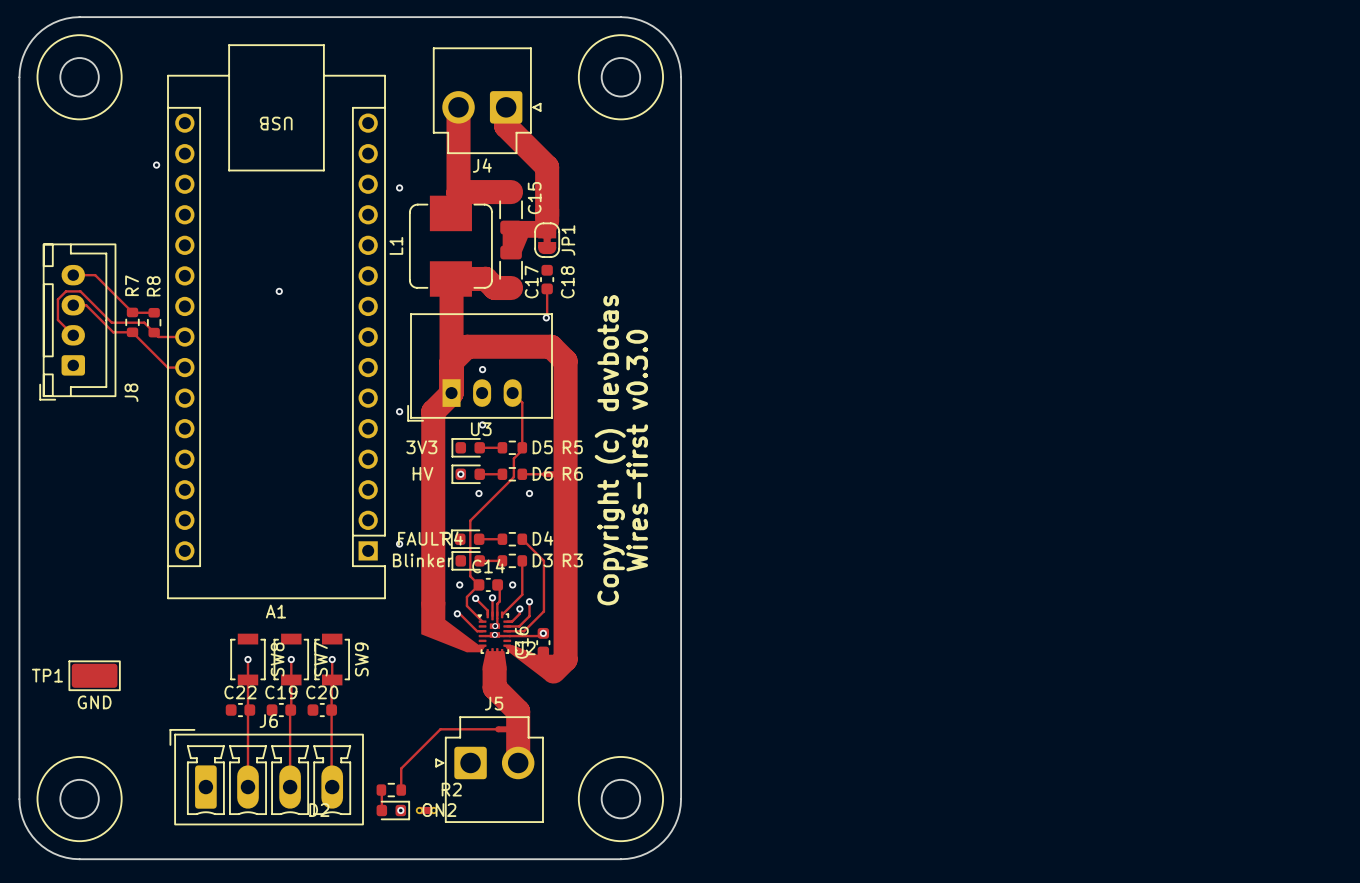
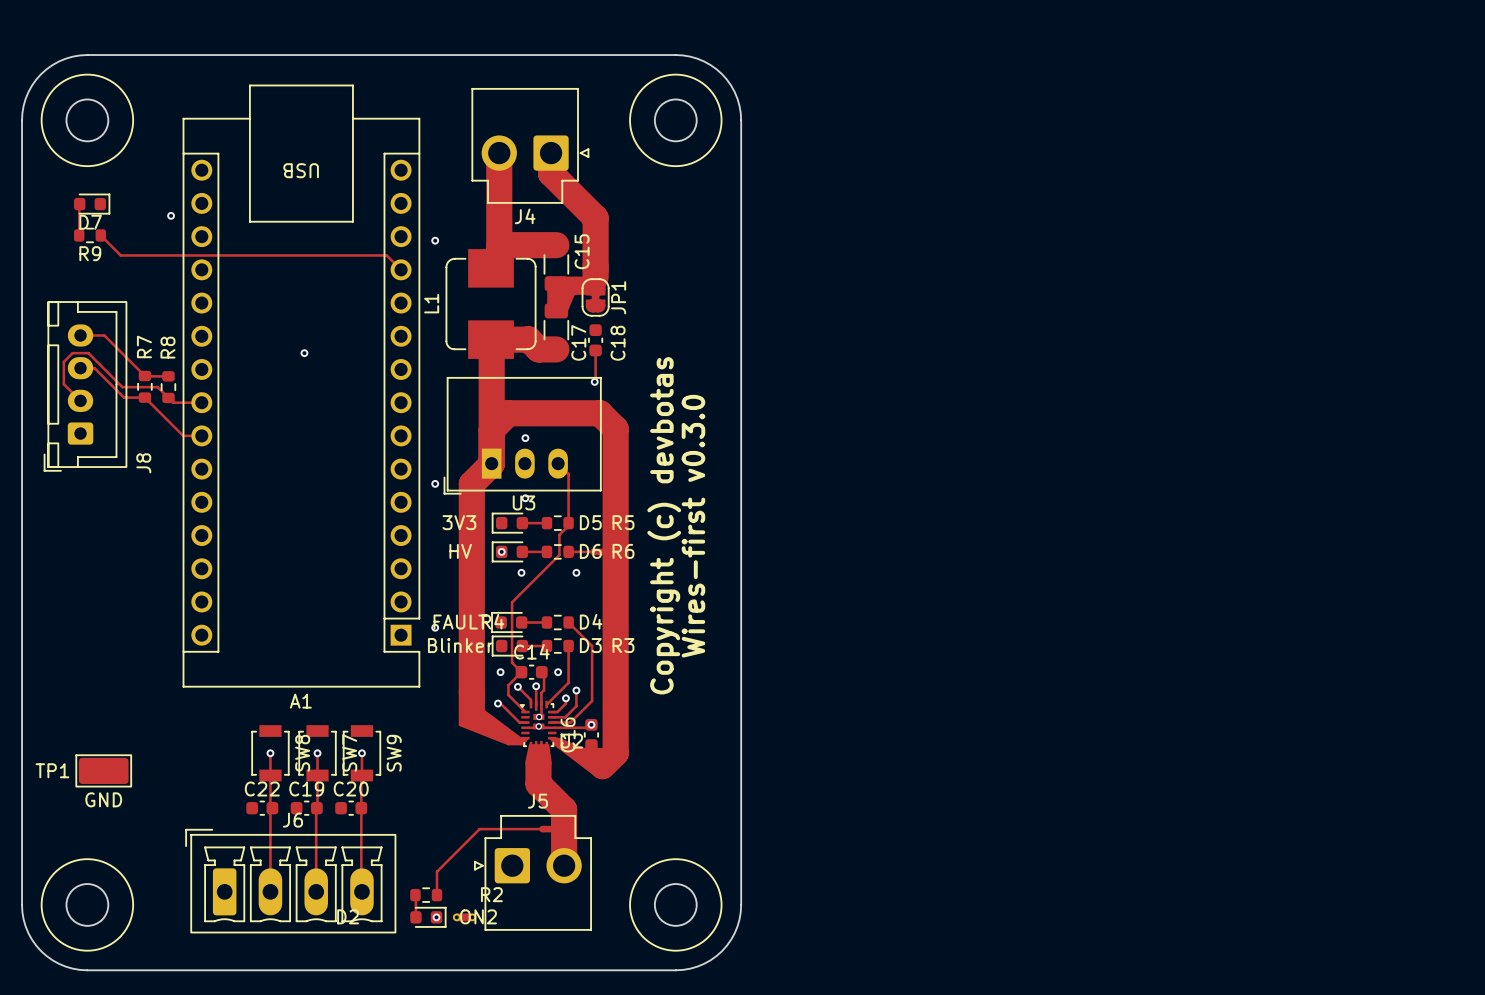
track: none -> (79, 204) (79, 235)
D7: none -> (92, 204)
R9: none -> (90, 235)
track: none -> (100, 235) (120, 255) (386, 255) (401, 269)

